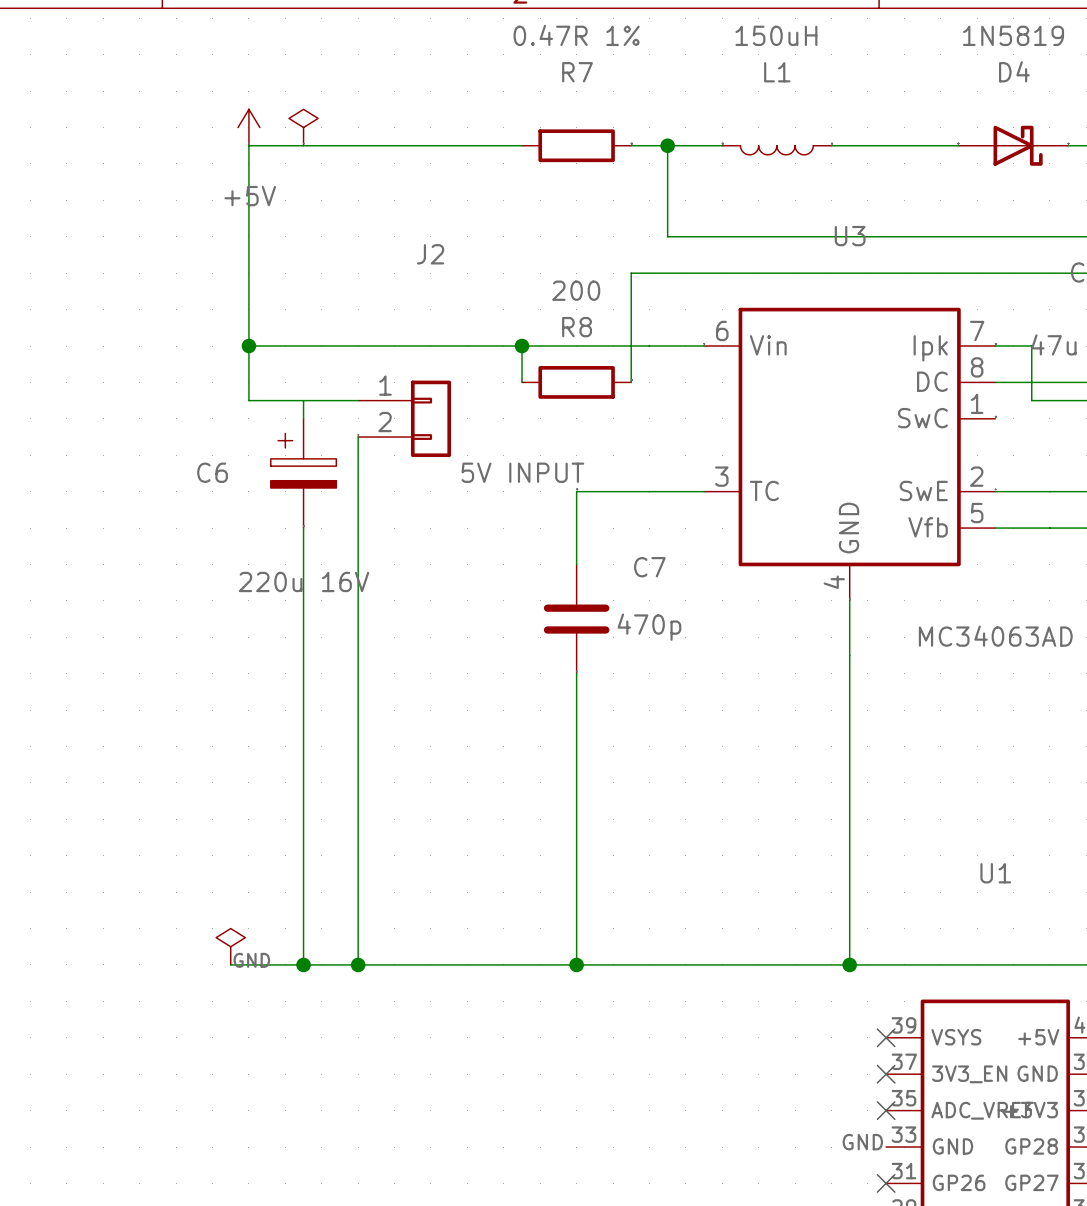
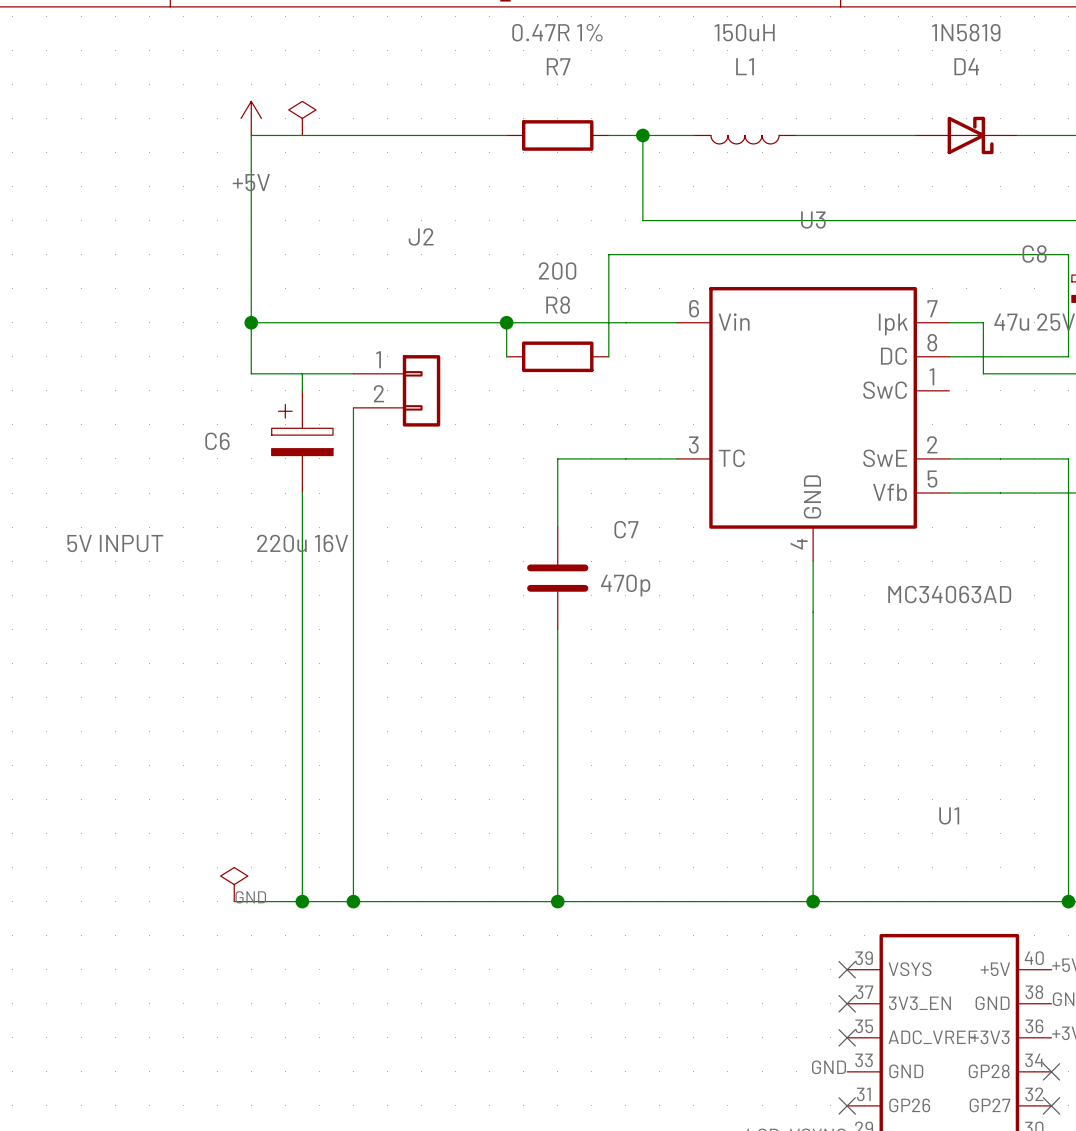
J2 value position: 5V INPUT (522, 472) -> 5V INPUT (115, 543)

